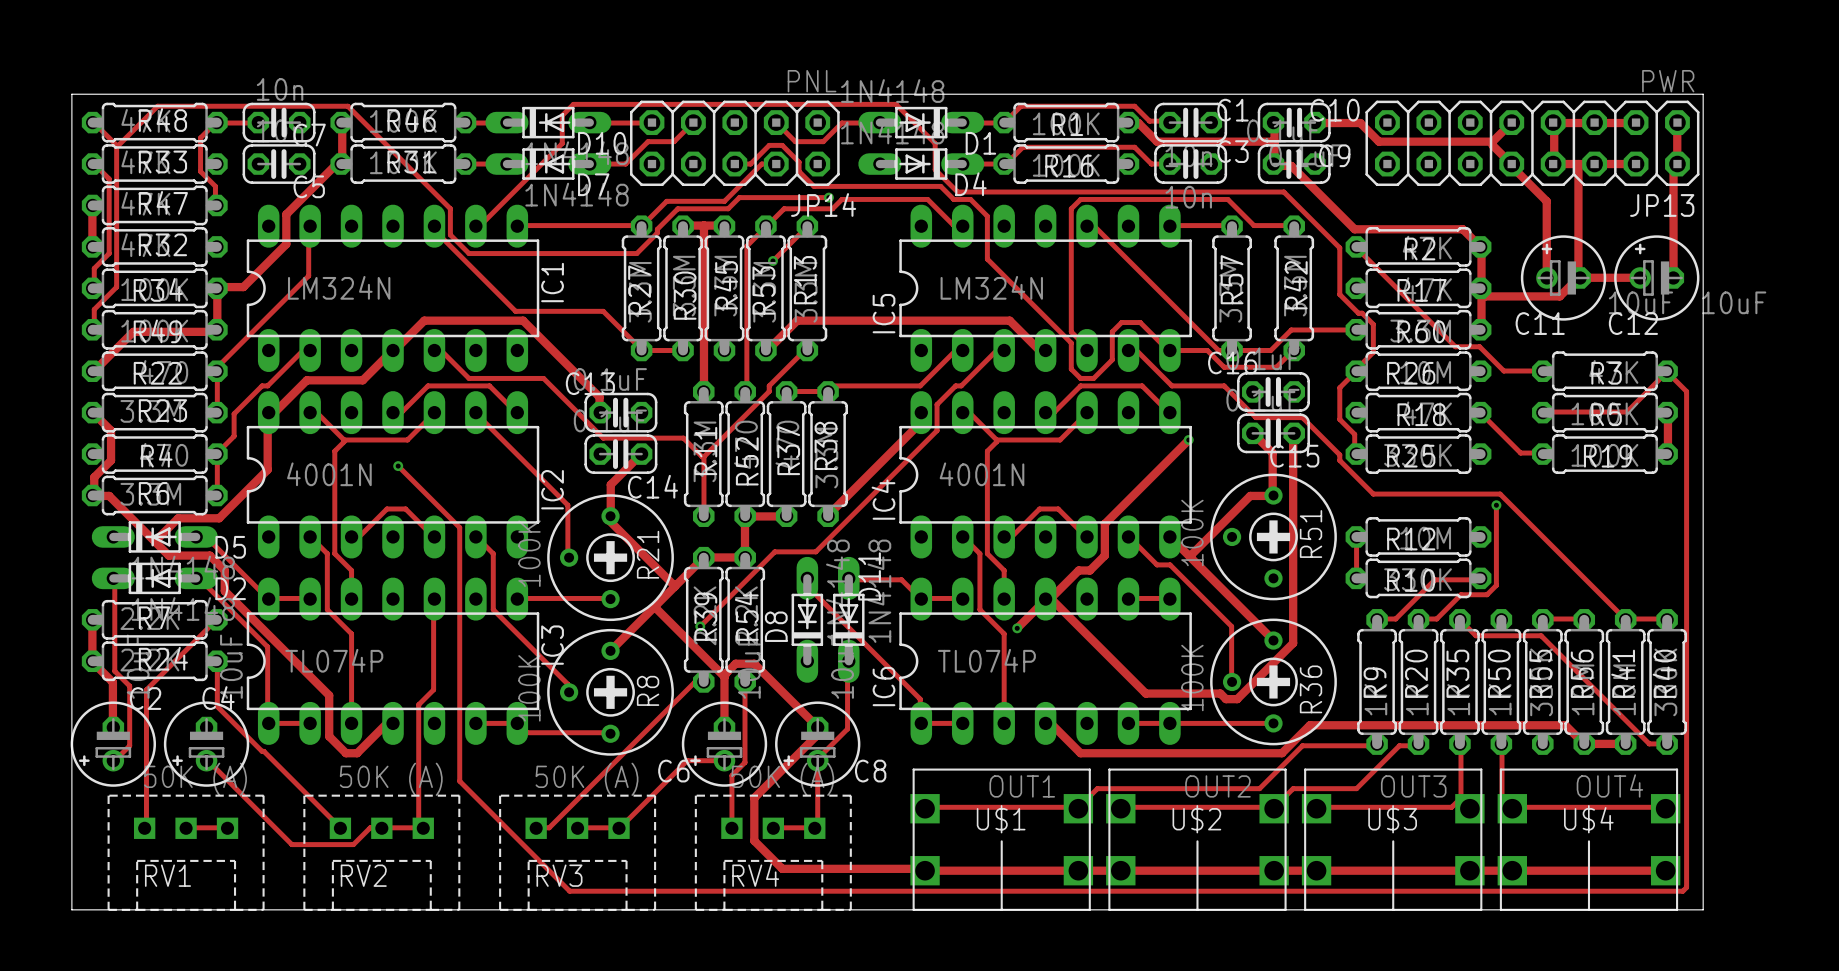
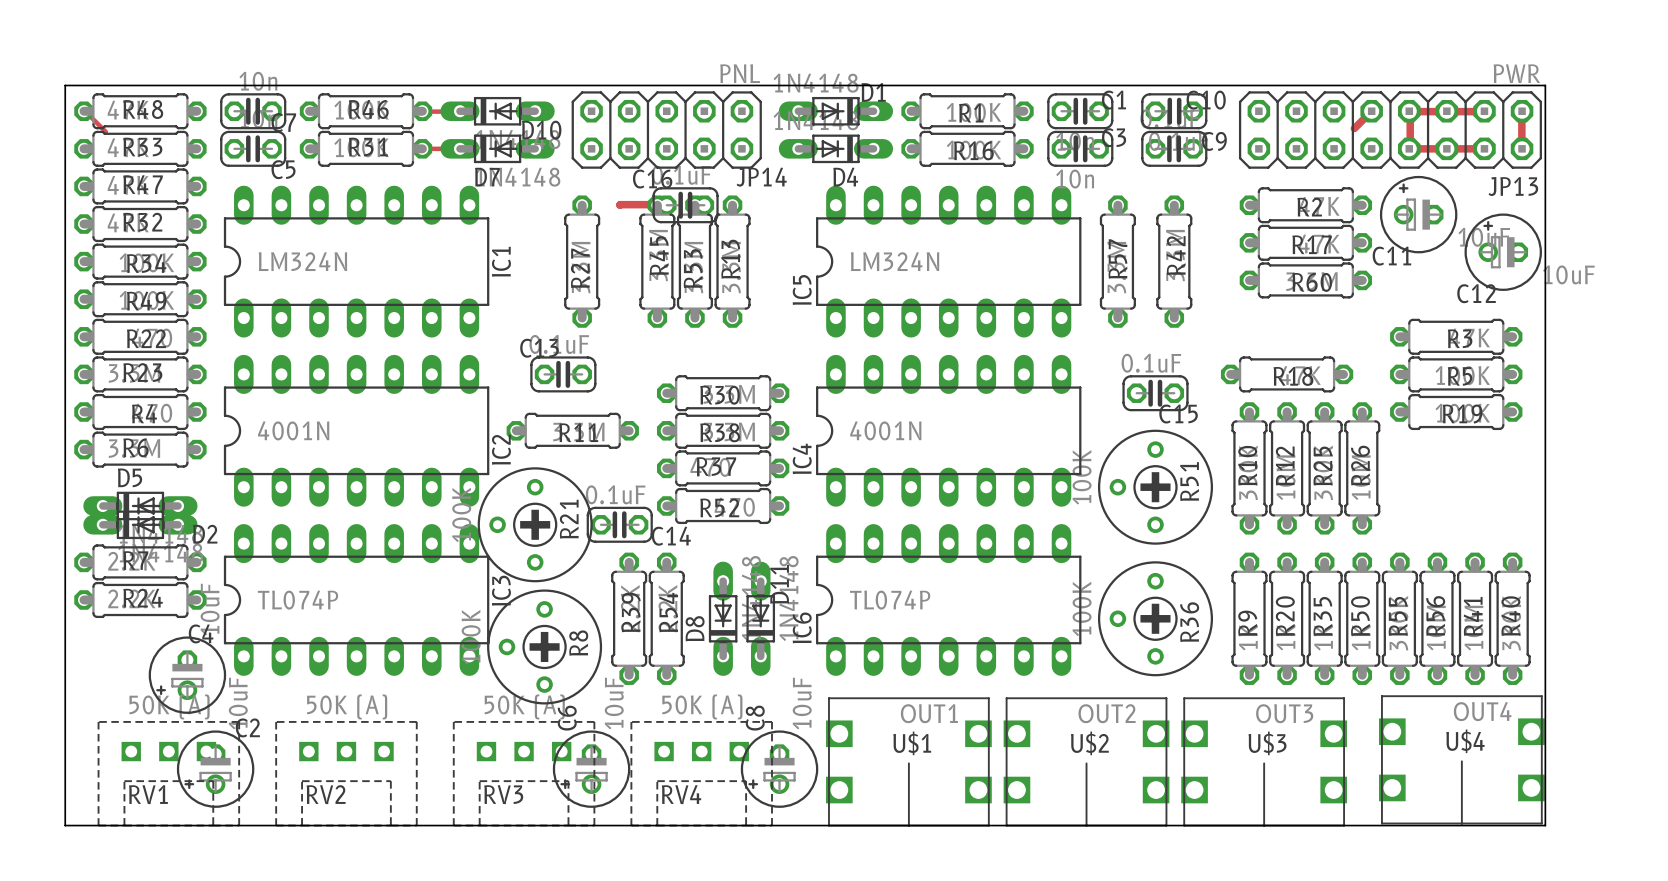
track: (258, 122) (216, 122) (200, 137) (200, 171) (215, 186) (216, 205) -> none
track: (341, 122) (342, 164) (334, 165) (286, 214) (286, 244) (243, 287) (216, 288) (216, 329) (213, 331) (133, 331) (92, 371) -> none
track: (589, 122) (651, 122) -> none
track: (693, 122) (674, 141) (648, 141) (625, 164) (589, 164) -> none
track: (776, 122) (795, 141) (823, 141) (841, 123) (879, 122) -> none
track: (962, 122) (1004, 123) (1020, 106) (1134, 106) (1149, 121) (1169, 122) -> none
track: (1128, 122) (1138, 123) (1157, 141) (1274, 141) -> none
track: (1273, 122) (1273, 164) (1291, 165) (1354, 229) (1462, 229) (1481, 247) (1480, 288) -> none
track: (1314, 122) (1360, 123) (1378, 141) (1492, 141) (1492, 145) (1546, 201) (1546, 277) -> none
D1 name position: D1 (980, 143) -> D1 (873, 92)
track: (92, 164) (109, 178) (109, 253) (94, 268) (94, 287) (92, 288) -> none
track: (734, 164) (750, 164) (769, 145) (782, 145) (799, 162) (799, 171) (813, 186) (940, 186) (953, 199) (970, 199) (987, 216) (987, 259) (1071, 343) (1071, 369) (1080, 378) (1093, 378) (1112, 359) (1112, 331) (1121, 322) (1140, 322) (1168, 350) (1207, 350) (1224, 367) (1276, 367) (1294, 350) -> none
track: (776, 164) (761, 164) (724, 201) (666, 201) (641, 226) (517, 226) -> none
track: (962, 164) (1006, 164) (1022, 147) (1134, 147) (1151, 164) (1169, 164) -> none
track: (1578, 164) (1578, 274) (1580, 277) (1559, 296) (1485, 296) (1480, 288) -> none
track: (1677, 164) (1673, 167) (1673, 277) -> none
D7 name position: D7 (593, 184) -> D7 (487, 177)
D4 name position: D4 (970, 184) -> D4 (845, 177)
track: (828, 197) (739, 197) (728, 208) (677, 208) (636, 253) (469, 253) (450, 234) (450, 208) (347, 106) (157, 106) (116, 145) (116, 287) (94, 309) (94, 328) (92, 329) -> none
via: (828, 197) -> none
JP14 name position: JP14 (823, 204) -> JP14 (761, 177)
track: (92, 205) (92, 246) -> none
track: (703, 225) (703, 391) -> none
track: (310, 226) (308, 275) (215, 369) (217, 372) (216, 412) -> none
track: (434, 226) (435, 231) (515, 311) (603, 311) (641, 350) (683, 350) -> none
track: (475, 226) (480, 225) (562, 143) (562, 115) (573, 104) (896, 104) (935, 143) (935, 169) (957, 192) (1283, 192) (1339, 247) (1339, 294) (1358, 313) (1362, 313) (1373, 324) (1373, 352) (1339, 387) (1339, 419) (1354, 434) (1354, 453) (1356, 454) -> none
track: (807, 226) (772, 260) -> none
track: (962, 226) (953, 225) (927, 199) (841, 199) (832, 208) (784, 208) (746, 246) (746, 391) (745, 391) -> none
track: (1087, 226) (1095, 227) (1218, 350) (1270, 350) (1291, 329) (1356, 329) -> none
track: (1169, 226) (1232, 226) -> none
track: (1294, 226) (1254, 225) (1227, 199) (1080, 199) (1071, 208) (1071, 331) (1086, 346) (1087, 350) -> none
track: (1356, 246) (1455, 346) (1479, 346) (1503, 371) (1542, 371) -> none
R2 position: (1418, 246) -> (1305, 205)
via: (772, 260) -> none
C11 position: (1563, 277) -> (1418, 214)
track: (1580, 277) (1639, 277) -> none
R30 rotation: 0° (683, 288) -> 90° clockwise (723, 393)
R30 position: (683, 288) -> (723, 393)
R17 position: (1418, 288) -> (1305, 242)
track: (1480, 288) (1480, 329) -> none
R60 position: (1418, 329) -> (1305, 280)
track: (310, 350) (303, 350) (267, 385) (262, 385) (234, 413) (234, 436) (216, 454) (216, 495) -> none
track: (434, 350) (441, 350) (469, 378) (543, 378) (603, 438) (683, 438) (703, 456) -> none
track: (765, 350) (797, 320) (1009, 320) (1039, 350) (1045, 350) -> none
track: (807, 350) (804, 350) (769, 385) (769, 391) (703, 456) -> none
track: (962, 350) (955, 350) (920, 385) (832, 385) (828, 391) (786, 391) -> none
track: (1004, 350) (996, 350) (961, 385) (955, 385) (937, 404) (937, 430) (815, 551) (774, 551) (700, 626) -> none
track: (1128, 350) (1136, 350) (1171, 385) (1224, 385) (1255, 417) (1302, 417) (1339, 454) (1339, 460) (1373, 494) (1500, 494) (1625, 619) (1667, 619) -> none
R26 rotation: 0° (1418, 371) -> 90° clockwise (1362, 468)
R26 position: (1418, 371) -> (1362, 468)
C16 position: (1273, 391) -> (685, 205)
track: (92, 412) (111, 430) (111, 460) (94, 477) (94, 494) (92, 495) (109, 495) (168, 555) (209, 555) (224, 570) (224, 591) (329, 695) (329, 736) (345, 753) (357, 753) (387, 723) (393, 723) -> none
track: (310, 412) (318, 413) (344, 439) -> none
track: (393, 412) (401, 412) (428, 385) (489, 385) (517, 412) -> none
track: (434, 412) (407, 439) (344, 439) -> none
track: (475, 412) (567, 505) (569, 557) -> none
track: (600, 412) (599, 397) (523, 320) (424, 320) (362, 380) (306, 380) (275, 412) (268, 412) (267, 469) (219, 518) (178, 518) (154, 541) -> none
track: (921, 412) (920, 423) (828, 516) -> none
track: (962, 412) (970, 413) (996, 439) -> none
track: (1045, 412) (1054, 412) (1080, 385) (1142, 385) (1169, 412) -> none
track: (1087, 412) (1060, 439) (996, 439) -> none
track: (1480, 412) (1520, 453) (1542, 454) -> none
track: (1542, 412) (1626, 412) (1667, 371) (1686, 391) (1686, 887) (1682, 891) (569, 891) (459, 781) (459, 527) (398, 466) -> none
track: (1667, 412) (1667, 454) -> none
track: (1252, 433) (1272, 453) (1273, 495) (1250, 495) (1189, 556) -> none
track: (1294, 433) (1293, 643) (1237, 699) (1226, 699) (1220, 693) (1145, 693) (1052, 600) (1045, 599) -> none
track: (344, 439) (334, 451) (334, 553) (351, 570) (351, 599) -> none
track: (996, 439) (987, 451) (987, 553) (1004, 570) (1004, 599) -> none
track: (1188, 439) (1104, 523) (1104, 555) (1089, 570) (1078, 570) (1052, 596) (1045, 599) -> none
via: (1188, 439) -> none
C14 position: (620, 454) -> (619, 524)
track: (641, 454) (610, 484) (610, 514) (608, 520) (675, 586) -> none
R11 rotation: 0° (703, 454) -> 90° clockwise (572, 430)
R52 rotation: 0° (745, 454) -> 90° clockwise (723, 505)
R52 position: (745, 454) -> (723, 505)
R37 rotation: 0° (786, 454) -> 90° clockwise (723, 468)
R38 rotation: 0° (828, 454) -> 90° clockwise (723, 430)
R25 rotation: 0° (1418, 454) -> 90° clockwise (1324, 468)
track: (703, 456) (703, 516) -> none
via: (398, 466) -> none
C14 name position: C14 (652, 486) -> C14 (671, 536)
track: (1496, 505) (1496, 585) (1487, 594) (1460, 594) (1436, 618) (1418, 619) -> none
via: (1496, 505) -> none
track: (745, 516) (786, 516) -> none
track: (745, 516) (745, 557) -> none
D5 position: (154, 536) -> (140, 505)
track: (196, 536) (206, 536) (268, 599) (310, 599) -> none
track: (310, 536) (327, 553) (327, 609) (351, 633) (351, 723) -> none
track: (351, 536) (359, 536) (387, 508) (405, 508) (434, 536) -> none
track: (475, 536) (493, 553) (493, 609) (567, 684) (569, 692) -> none
track: (962, 536) (979, 553) (979, 609) (1004, 633) (1004, 723) -> none
track: (1004, 536) (1011, 536) (1039, 508) (1058, 508) (1087, 536) -> none
track: (1128, 536) (1157, 564) (1170, 564) (1231, 626) (1232, 681) -> none
track: (1170, 536) (1273, 640) -> none
track: (1356, 536) (1356, 578) -> none
R12 rotation: 0° (1418, 536) -> 90° clockwise (1287, 468)
D5 name position: D5 (230, 547) -> D5 (130, 477)
R21 position: (610, 557) -> (535, 524)
track: (745, 557) (703, 557) (610, 650) -> none
track: (113, 578) (114, 671) (129, 686) (129, 745) (113, 760) -> none
track: (196, 578) (200, 579) (267, 646) (268, 723) (310, 723) -> none
track: (807, 578) (808, 587) (920, 699) (920, 723) (962, 723) -> none
track: (848, 578) (901, 579) (921, 599) (962, 599) -> none
R10 rotation: 0° (1418, 578) -> 90° clockwise (1249, 468)
track: (1480, 578) (1434, 579) (1395, 618) (1377, 619) -> none
track: (434, 599) (433, 689) (418, 704) (418, 825) (423, 828) (370, 827) (353, 844) (291, 844) (206, 760) -> none
track: (517, 599) (610, 599) -> none
track: (1045, 599) (1017, 628) -> none
track: (1128, 599) (1169, 599) -> none
track: (654, 606) (724, 676) -> none
track: (92, 619) (92, 661) (112, 682) (113, 727) -> none
track: (216, 619) (146, 689) (146, 827) (144, 828) -> none
R39 position: (703, 619) -> (629, 618)
R54 position: (745, 619) -> (666, 618)
D8 position: (807, 619) -> (723, 618)
D11 position: (848, 619) -> (760, 618)
track: (1459, 619) (1475, 635) (1541, 635) (1649, 743) (1667, 744) -> none
track: (1542, 619) (1584, 619) -> none
via: (700, 626) -> none
via: (1017, 628) -> none
track: (216, 661) (217, 706) (340, 828) -> none
track: (848, 661) (847, 728) (817, 758) (817, 822) (813, 825) (814, 828) (773, 828) -> none
track: (724, 676) (724, 727) -> none
track: (724, 676) (735, 663) (754, 663) (817, 727) (815, 736) (754, 797) (754, 840) (782, 868) (922, 868) (925, 870) (1665, 870) -> none
track: (703, 681) (694, 682) (549, 827) (536, 828) -> none
track: (745, 681) (745, 762) (731, 775) (731, 828) -> none
R8 position: (610, 692) -> (544, 646)
track: (475, 723) (517, 723) (526, 732) (610, 733) -> none
track: (1045, 723) (1050, 723) (1080, 753) (1281, 753) (1309, 725) (1565, 725) (1584, 744) (1625, 744) -> none
track: (1128, 723) (1273, 723) -> none
C2 position: (113, 744) -> (215, 769)
C6 position: (724, 744) -> (591, 769)
C8 position: (817, 744) -> (779, 769)
track: (1377, 744) (1377, 745) (1302, 745) (1259, 788) (1097, 788) (1078, 808) (925, 808) -> none
track: (1418, 744) (1418, 745) (1399, 745) (1356, 788) (1293, 788) (1274, 808) (1120, 808) -> none
track: (1459, 744) (1460, 799) (1469, 808) (1459, 799) (1451, 807) (1316, 808) -> none
track: (1501, 744) (1502, 797) (1512, 808) (1665, 808) -> none
track: (724, 760) (687, 760) (620, 827) (577, 828) -> none
C6 name rotation: 0° (673, 771) -> 90° counterclockwise (567, 718)
C8 name rotation: 0° (870, 771) -> 90° counterclockwise (755, 718)
track: (186, 828) (227, 828) -> none
U$4 position: (1588, 839) -> (1461, 759)

